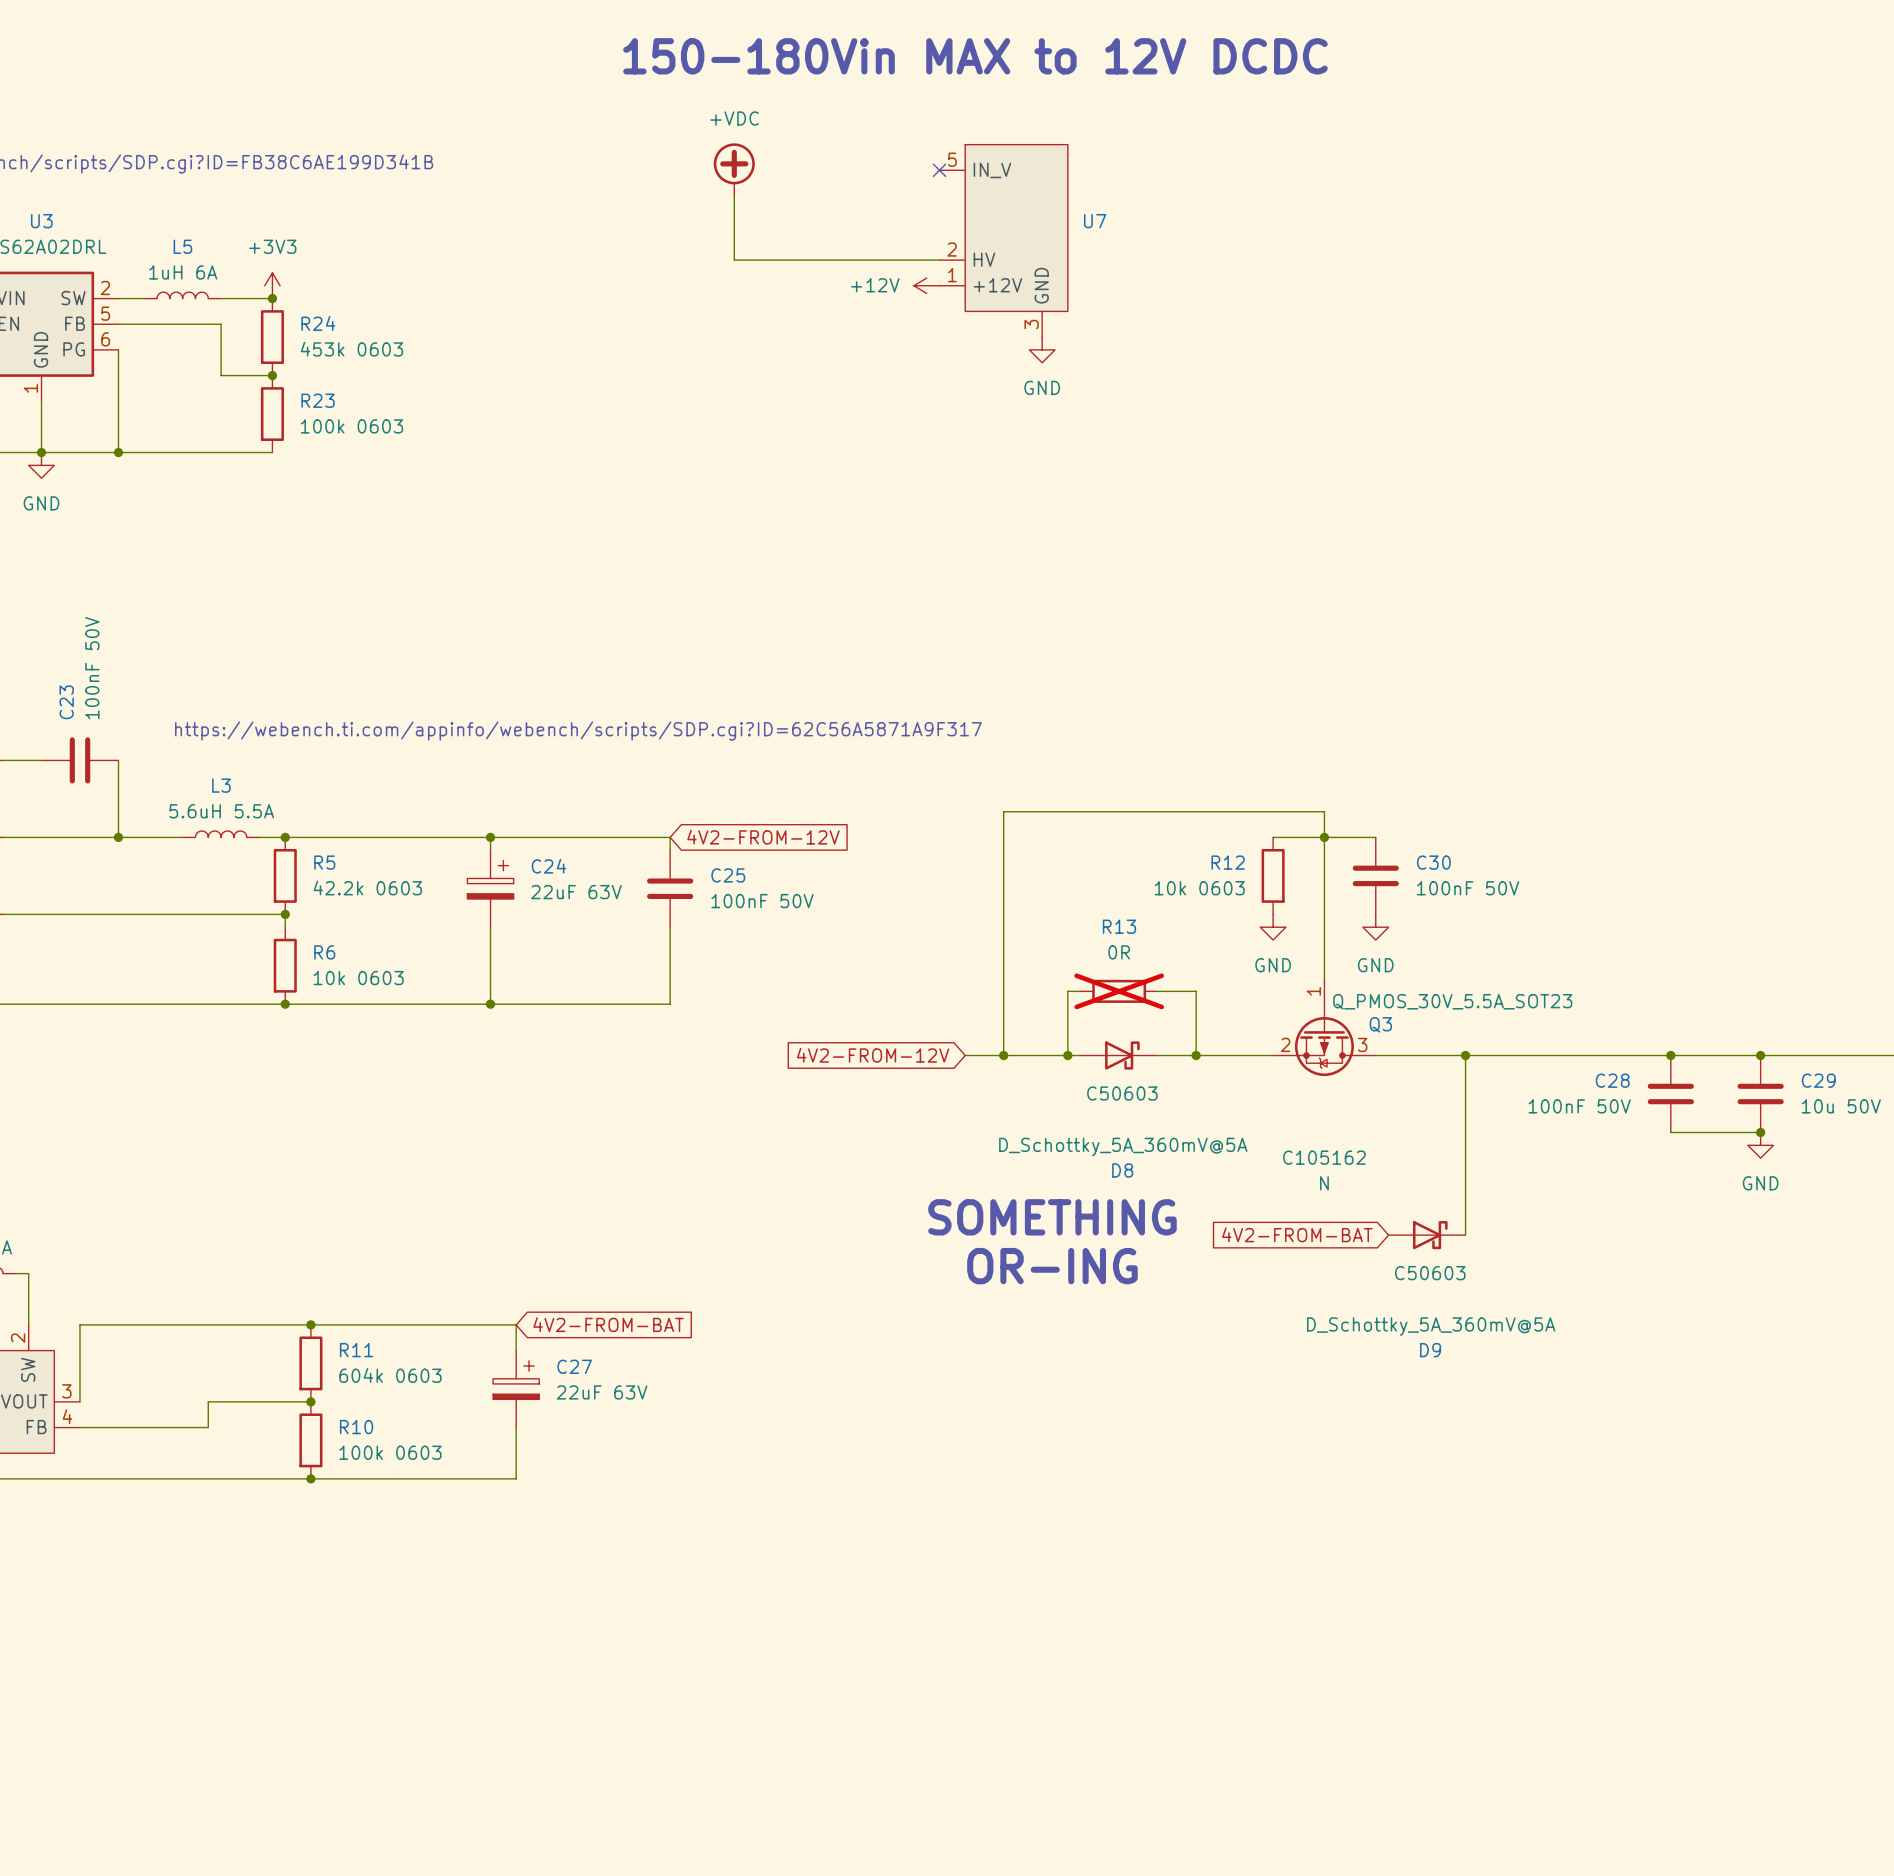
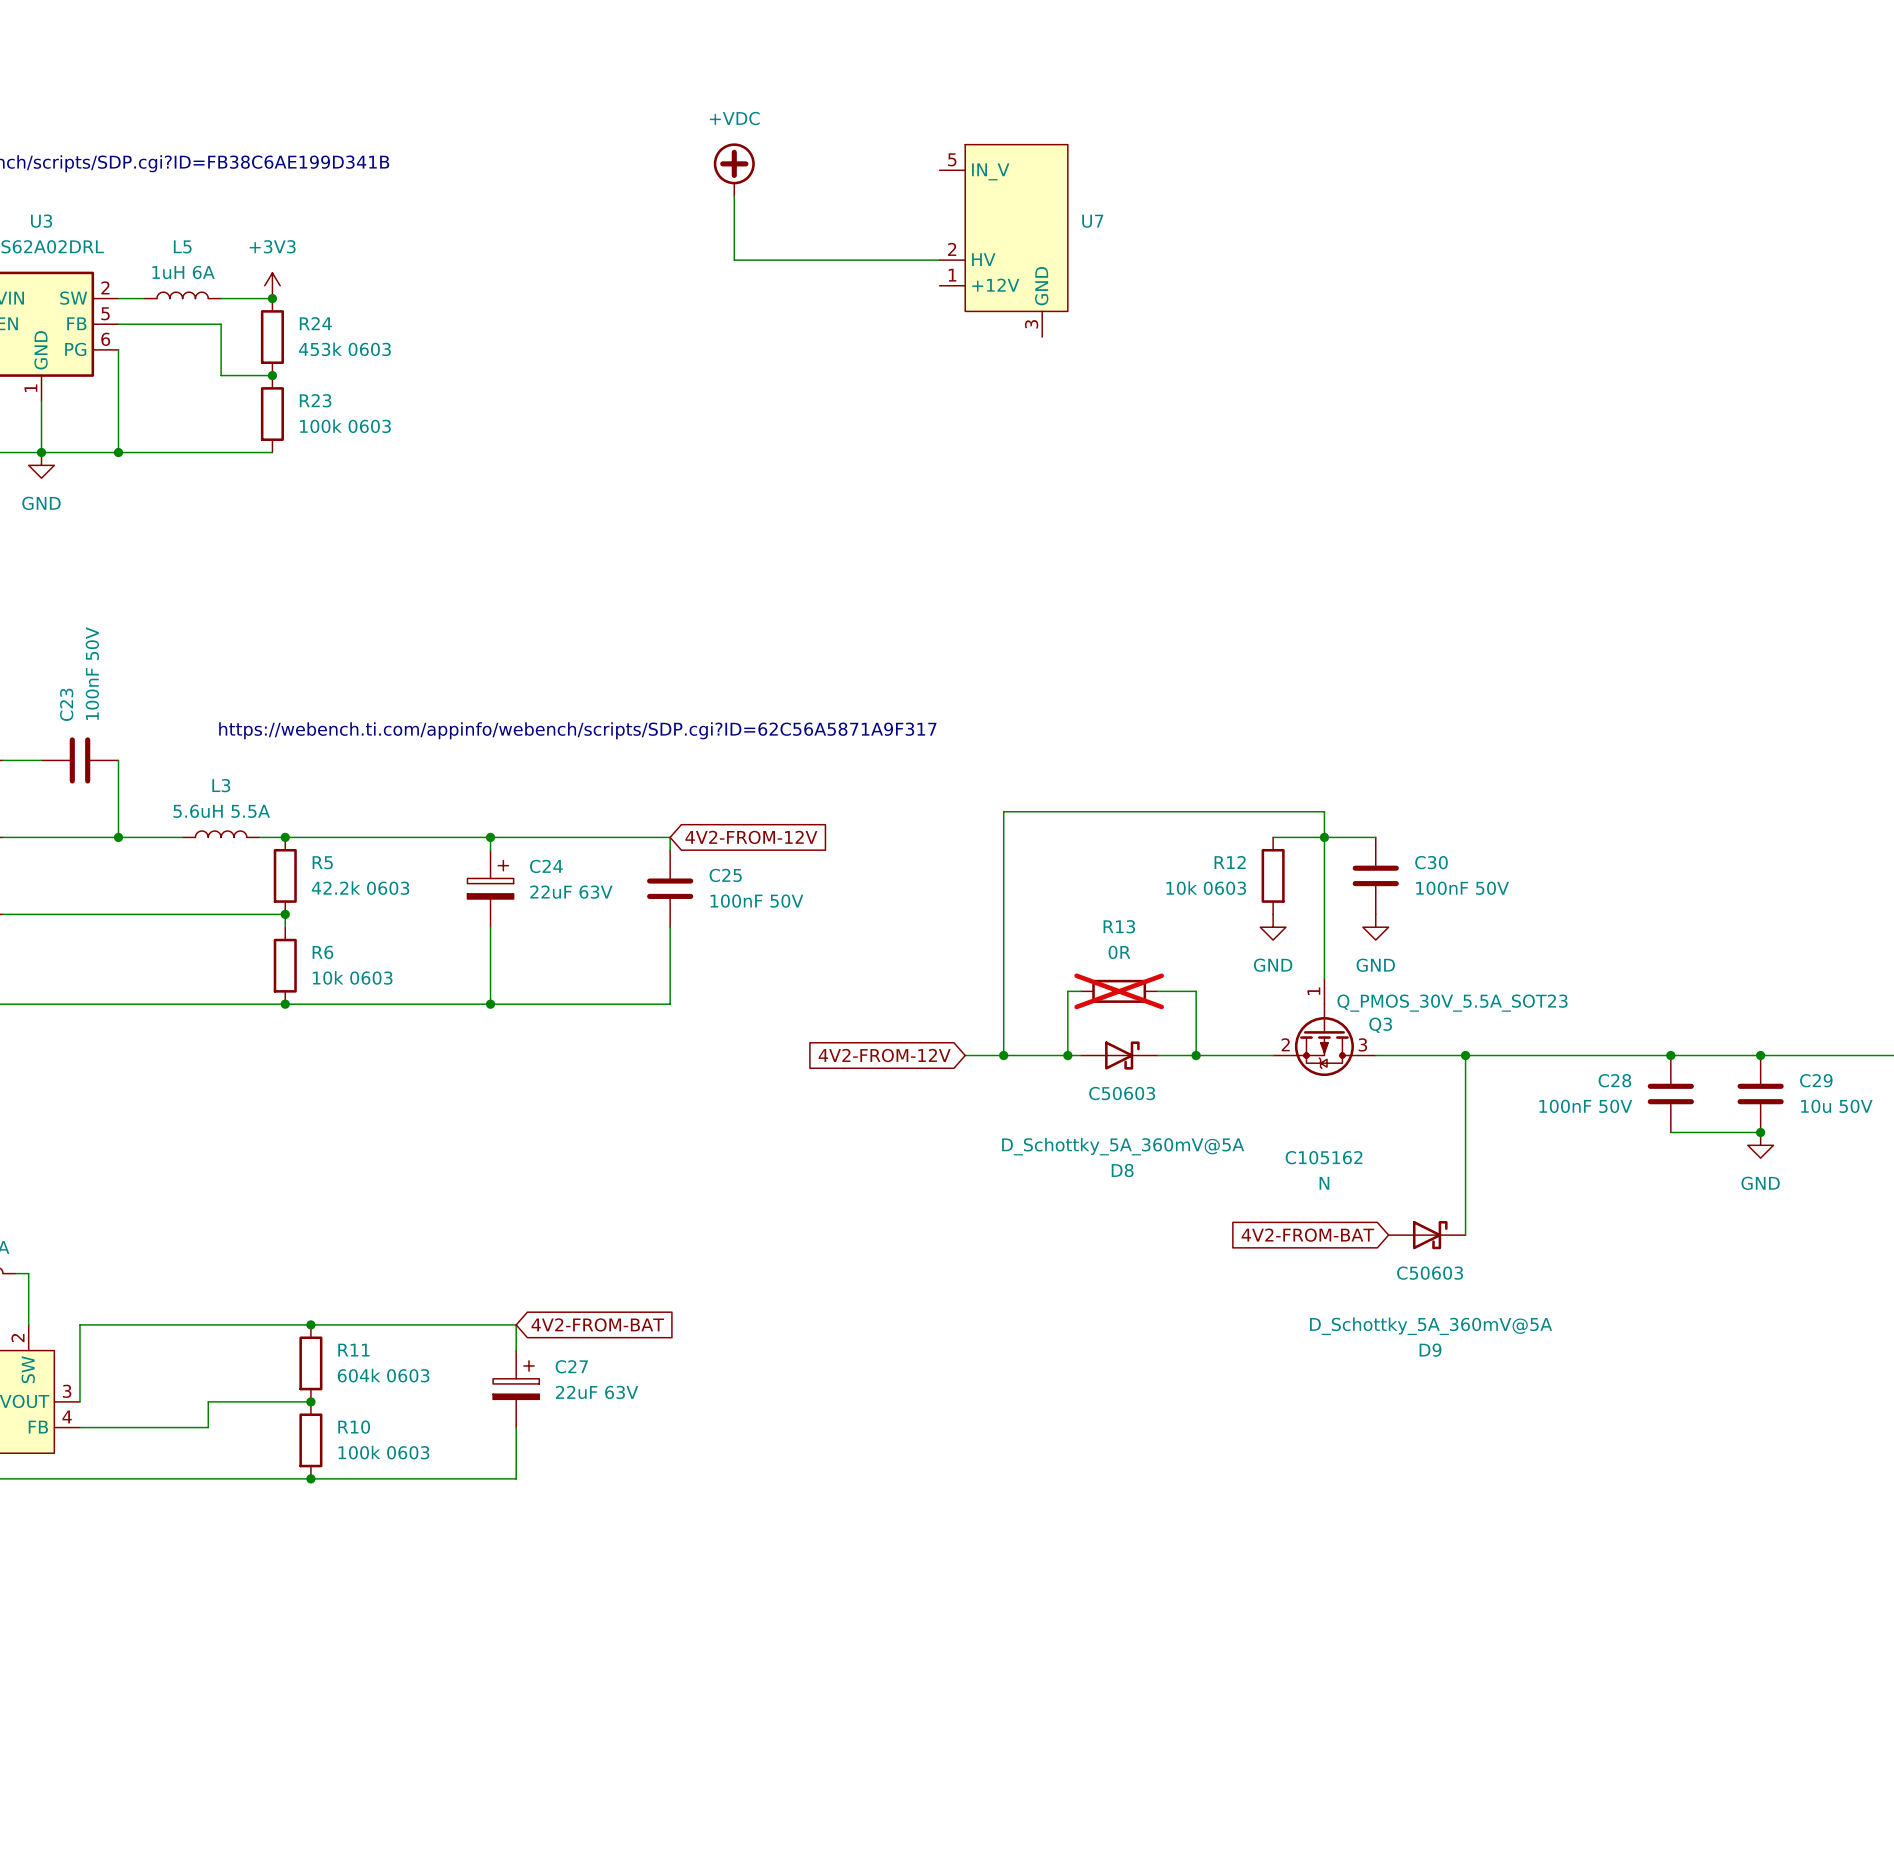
text: 150-180Vin MAX to 12V DCDC (975, 56) -> none
no-connect mark: (939, 170) -> none
power symbol: +12V (926, 285) -> none
power symbol: GND (1042, 349) -> none
text: SOMETHING (1052, 1217) -> none
text: OR-ING (1052, 1266) -> none

